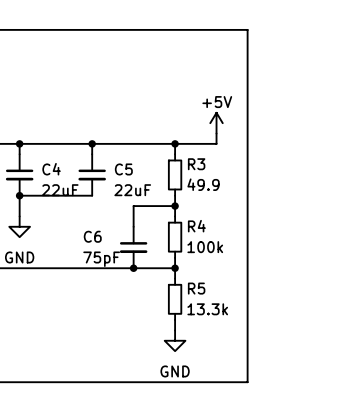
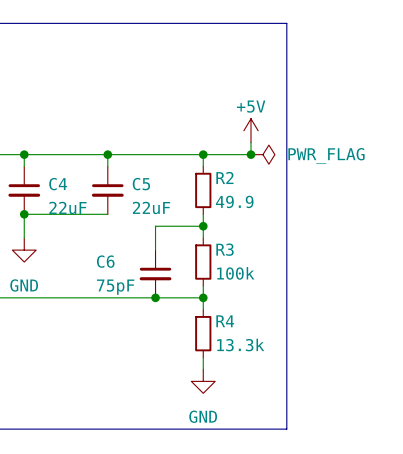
junction: none -> (251, 154)
power symbol: none -> PWR_FLAG (262, 154)
R3 name: R3 (196, 164) -> R2 (224, 177)
R4 name: R4 (196, 226) -> R3 (225, 249)
R5 name: R5 (196, 288) -> R4 (225, 321)

